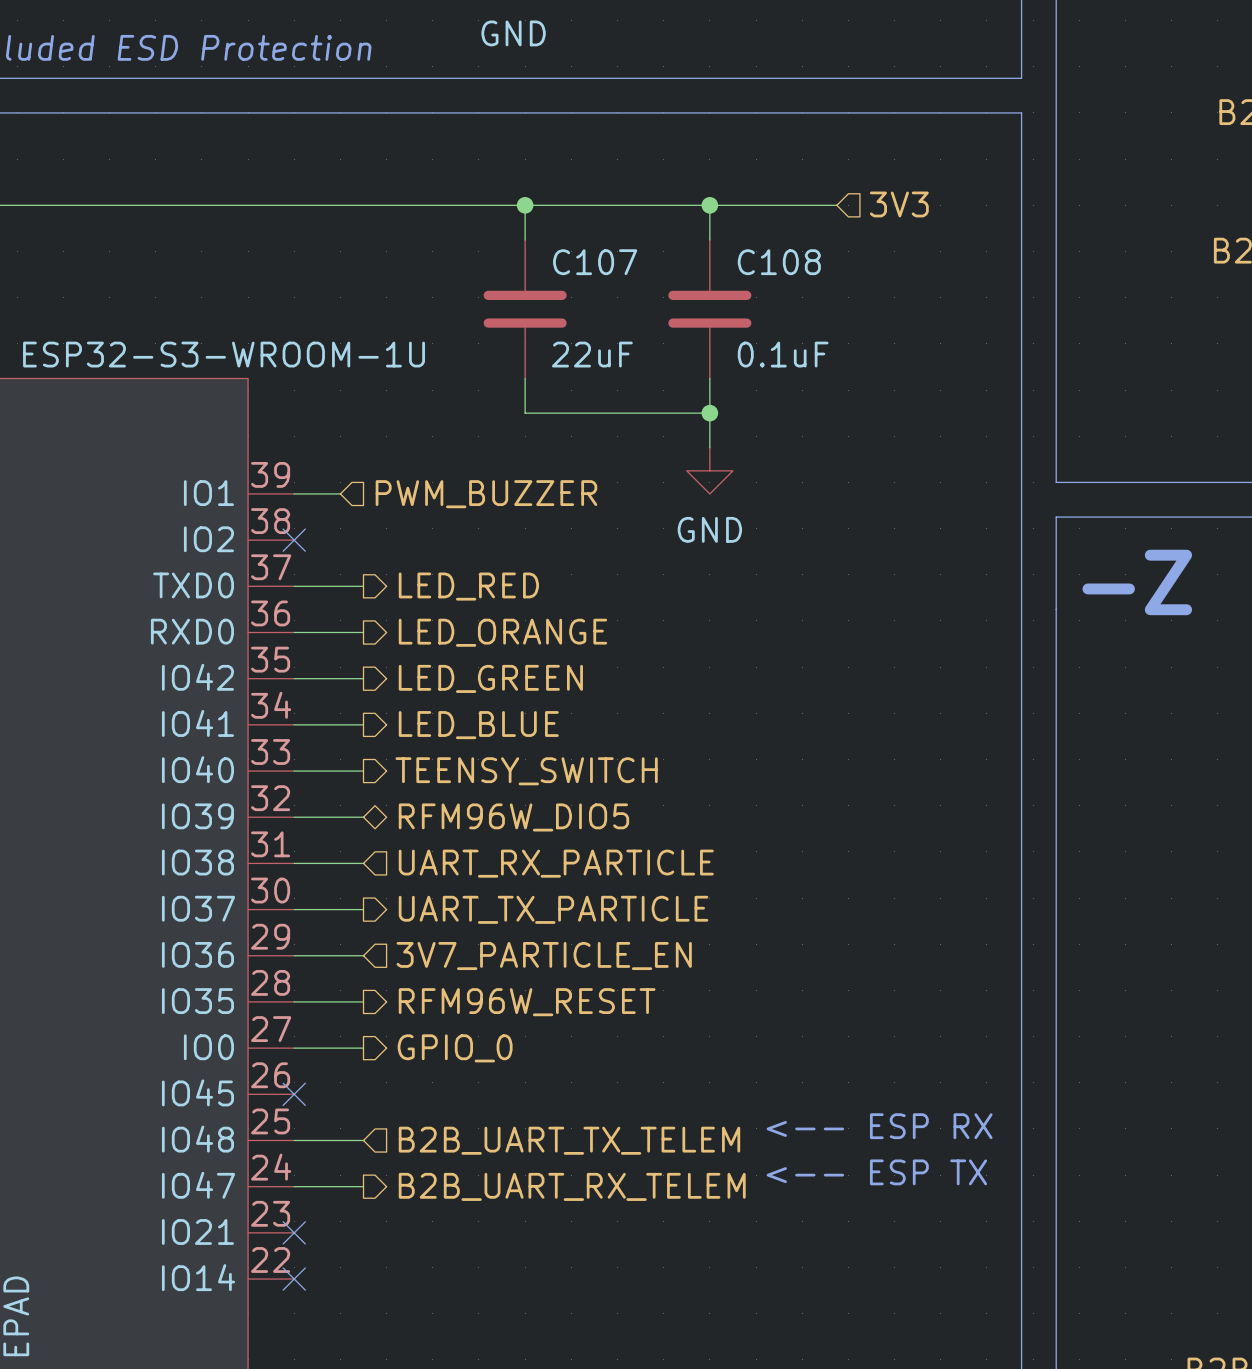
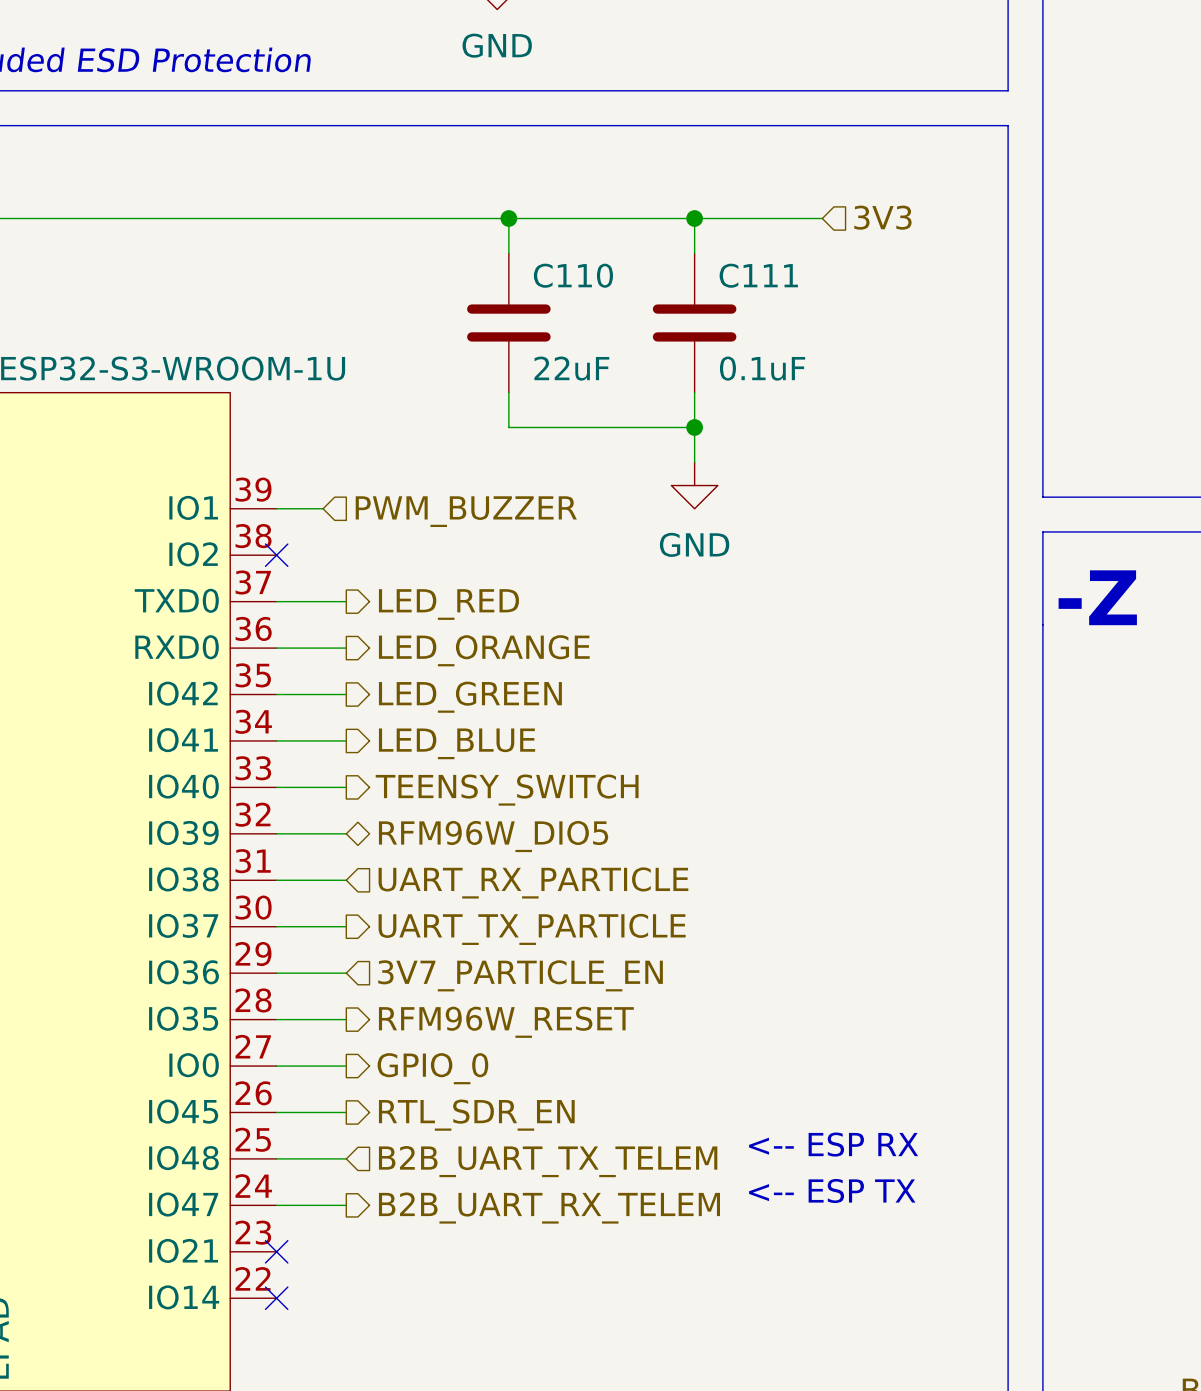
C107 name: C107 (595, 262) -> C110 (573, 275)
C108 name: C108 (779, 262) -> C111 (758, 275)
wire: none -> (276, 1112) (346, 1112)
no-connect mark: (294, 1094) -> none
hierarchical label: none -> RTL_SDR_EN (476, 1115)

